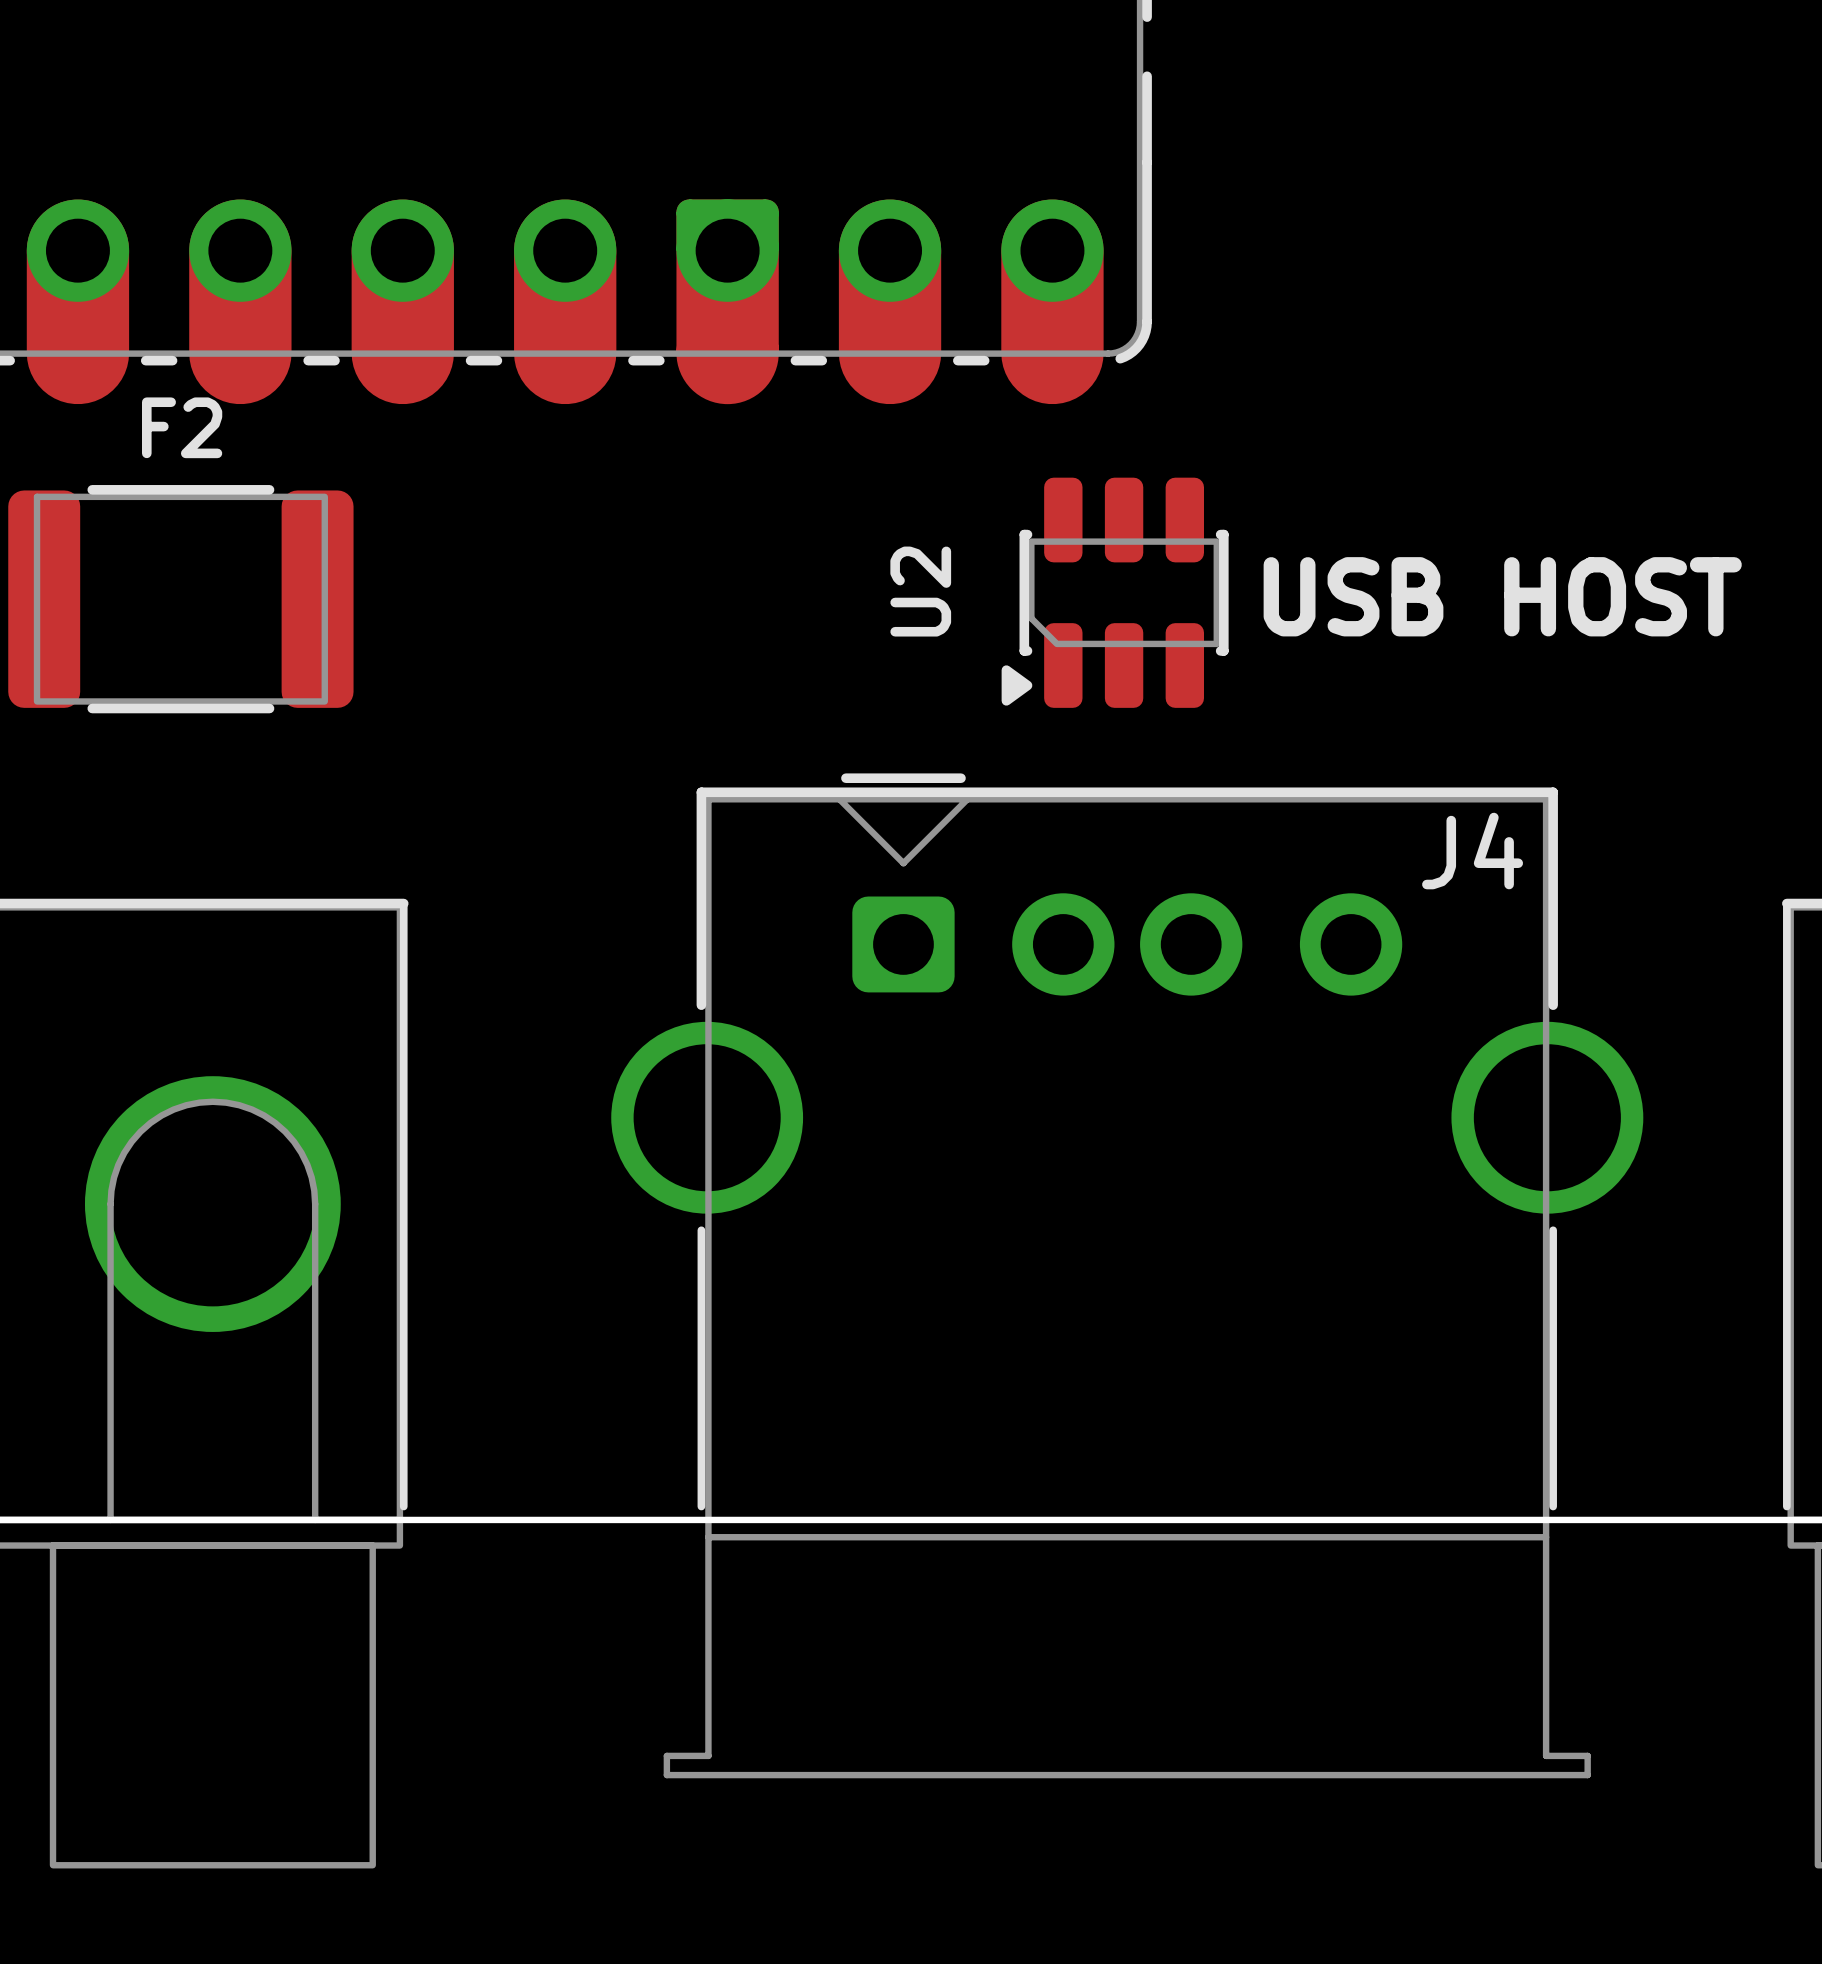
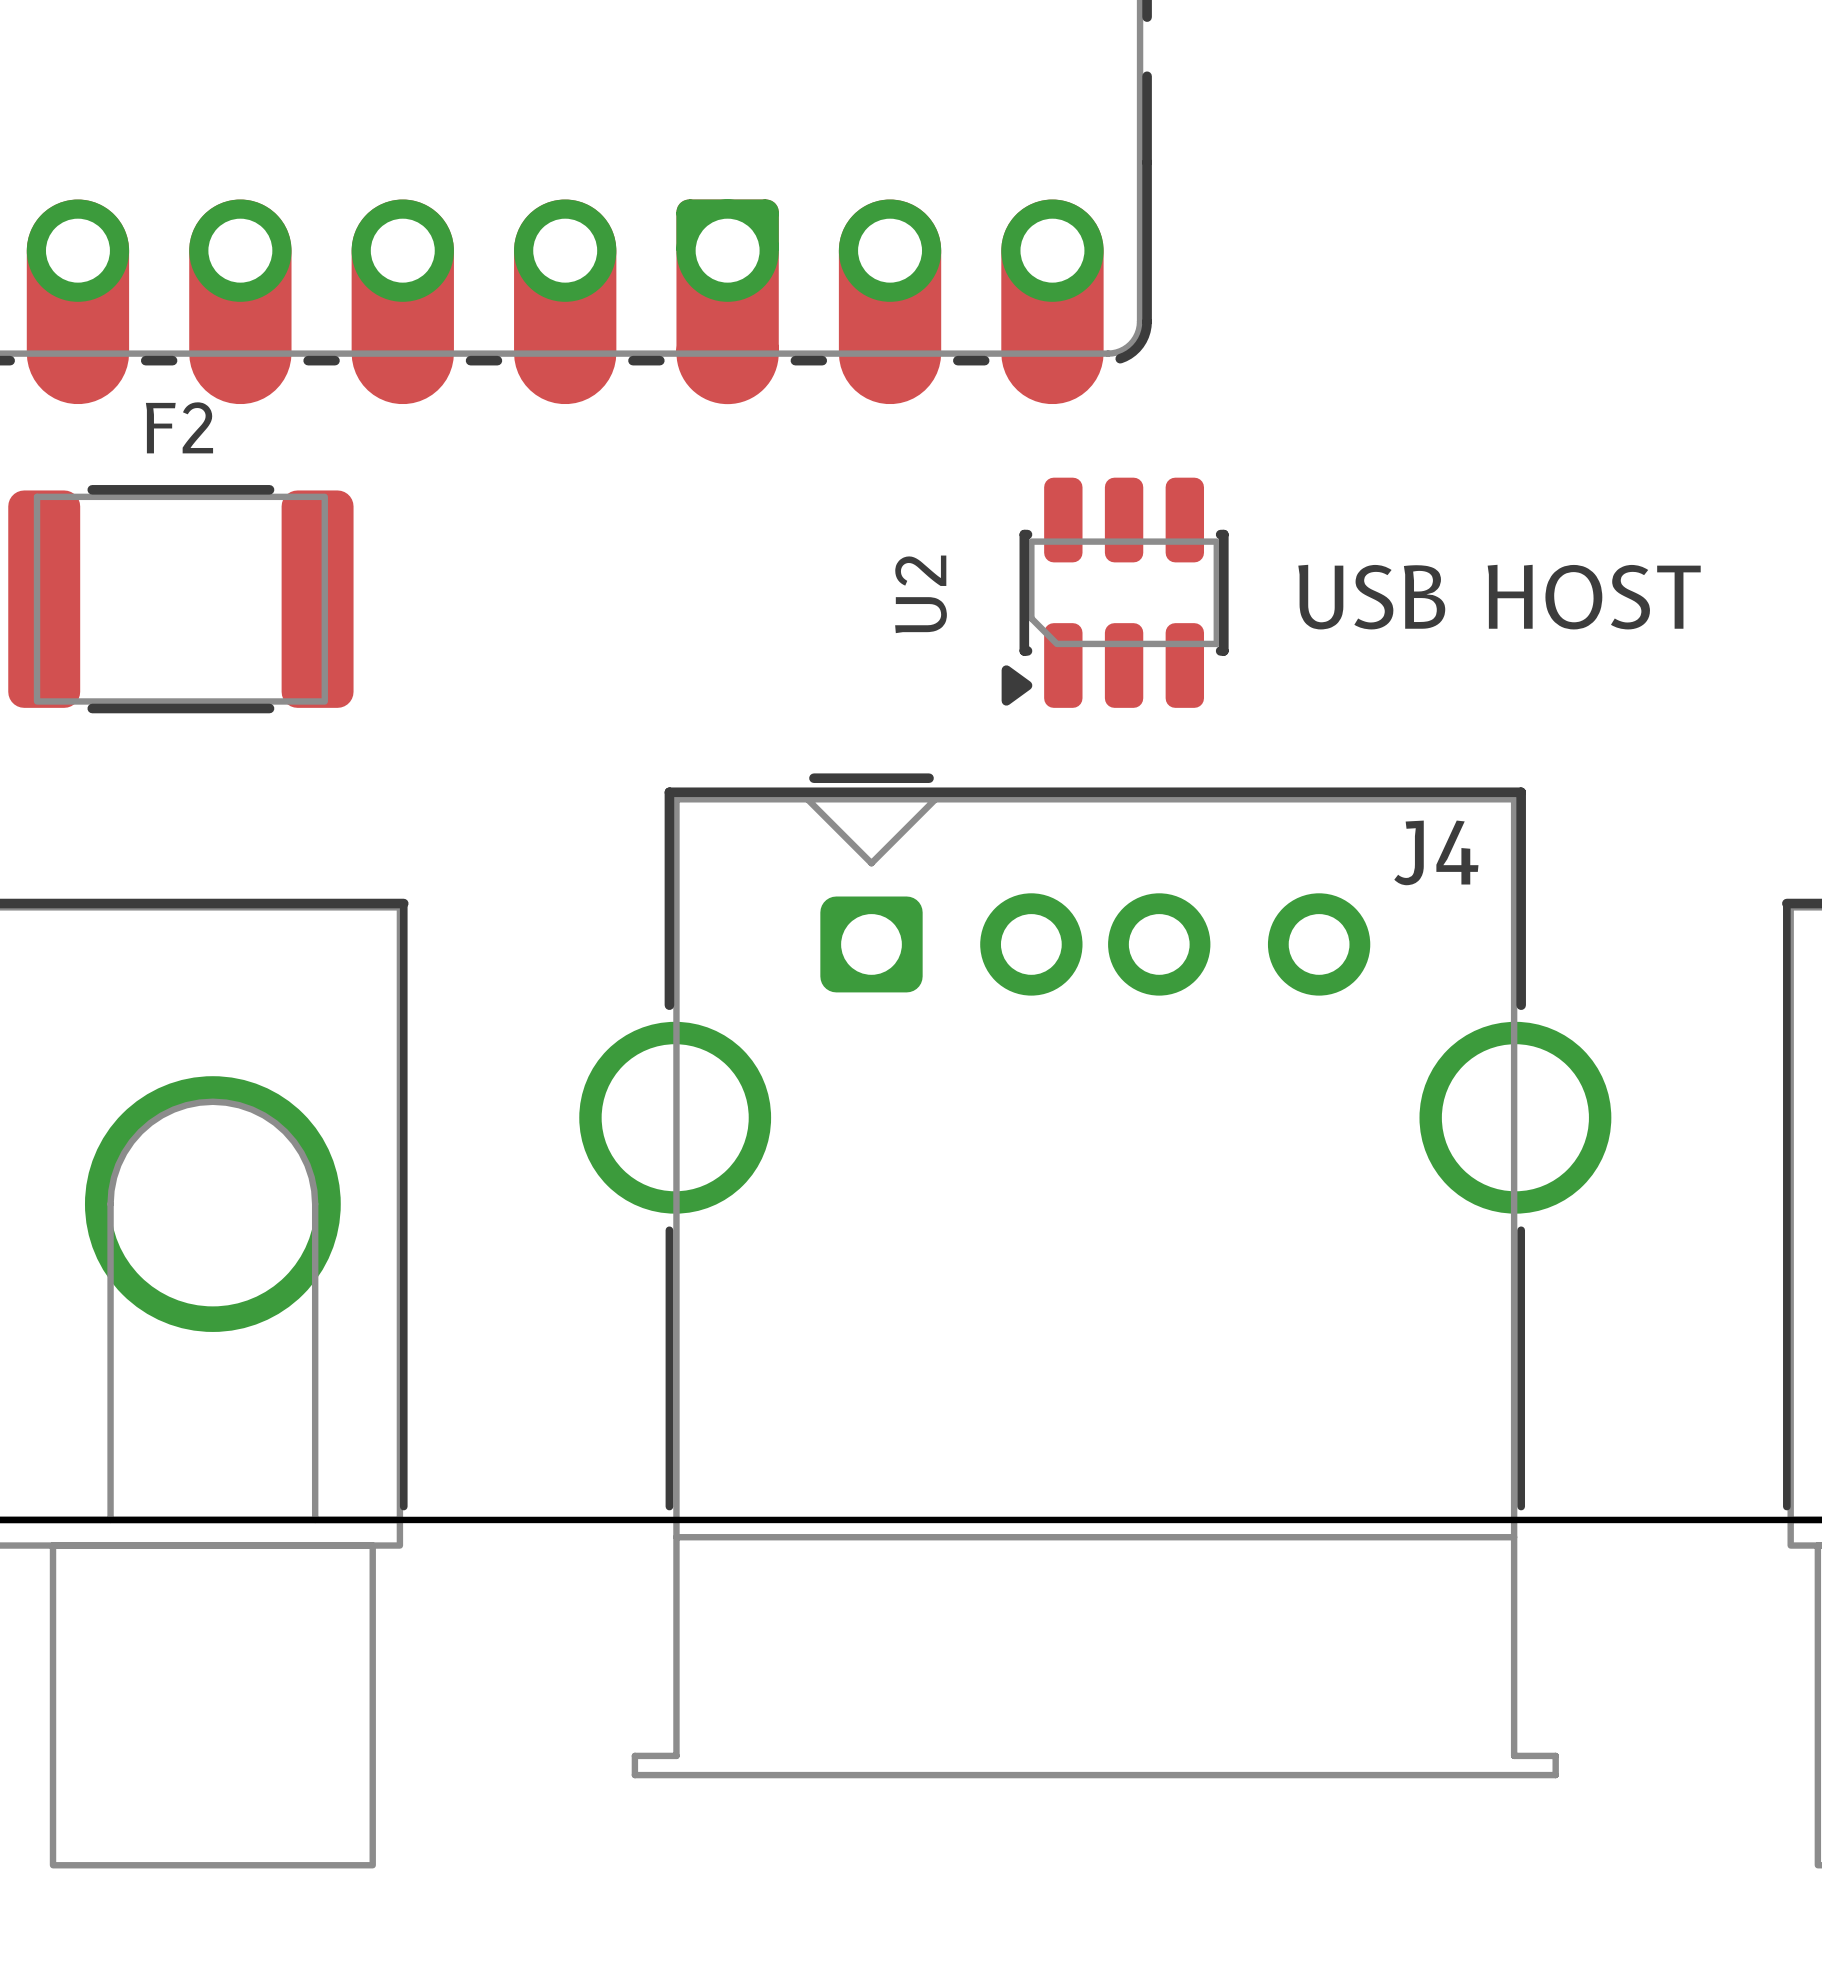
J4 position: (1127, 1275) -> (1095, 1275)

